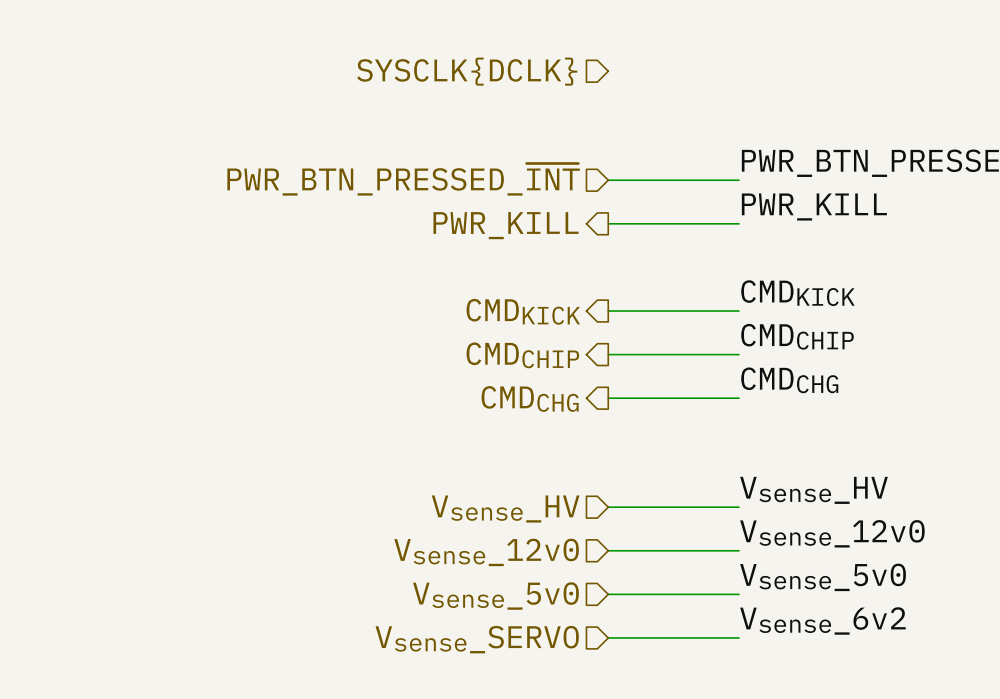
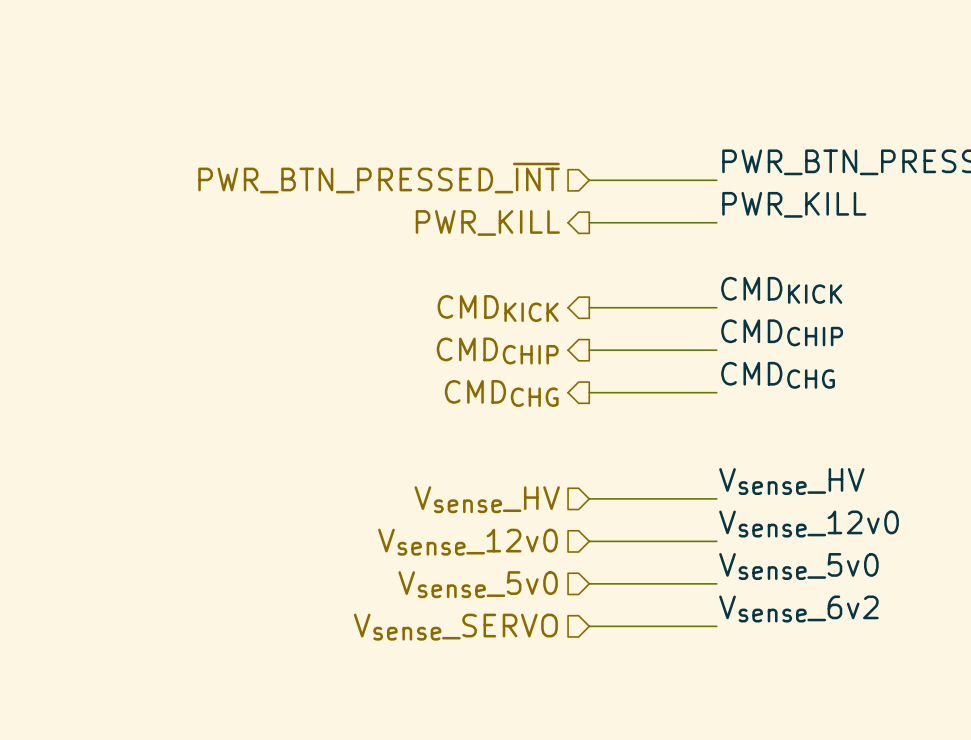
hierarchical label: SYSCLK{DCLK} (467, 71) -> none

